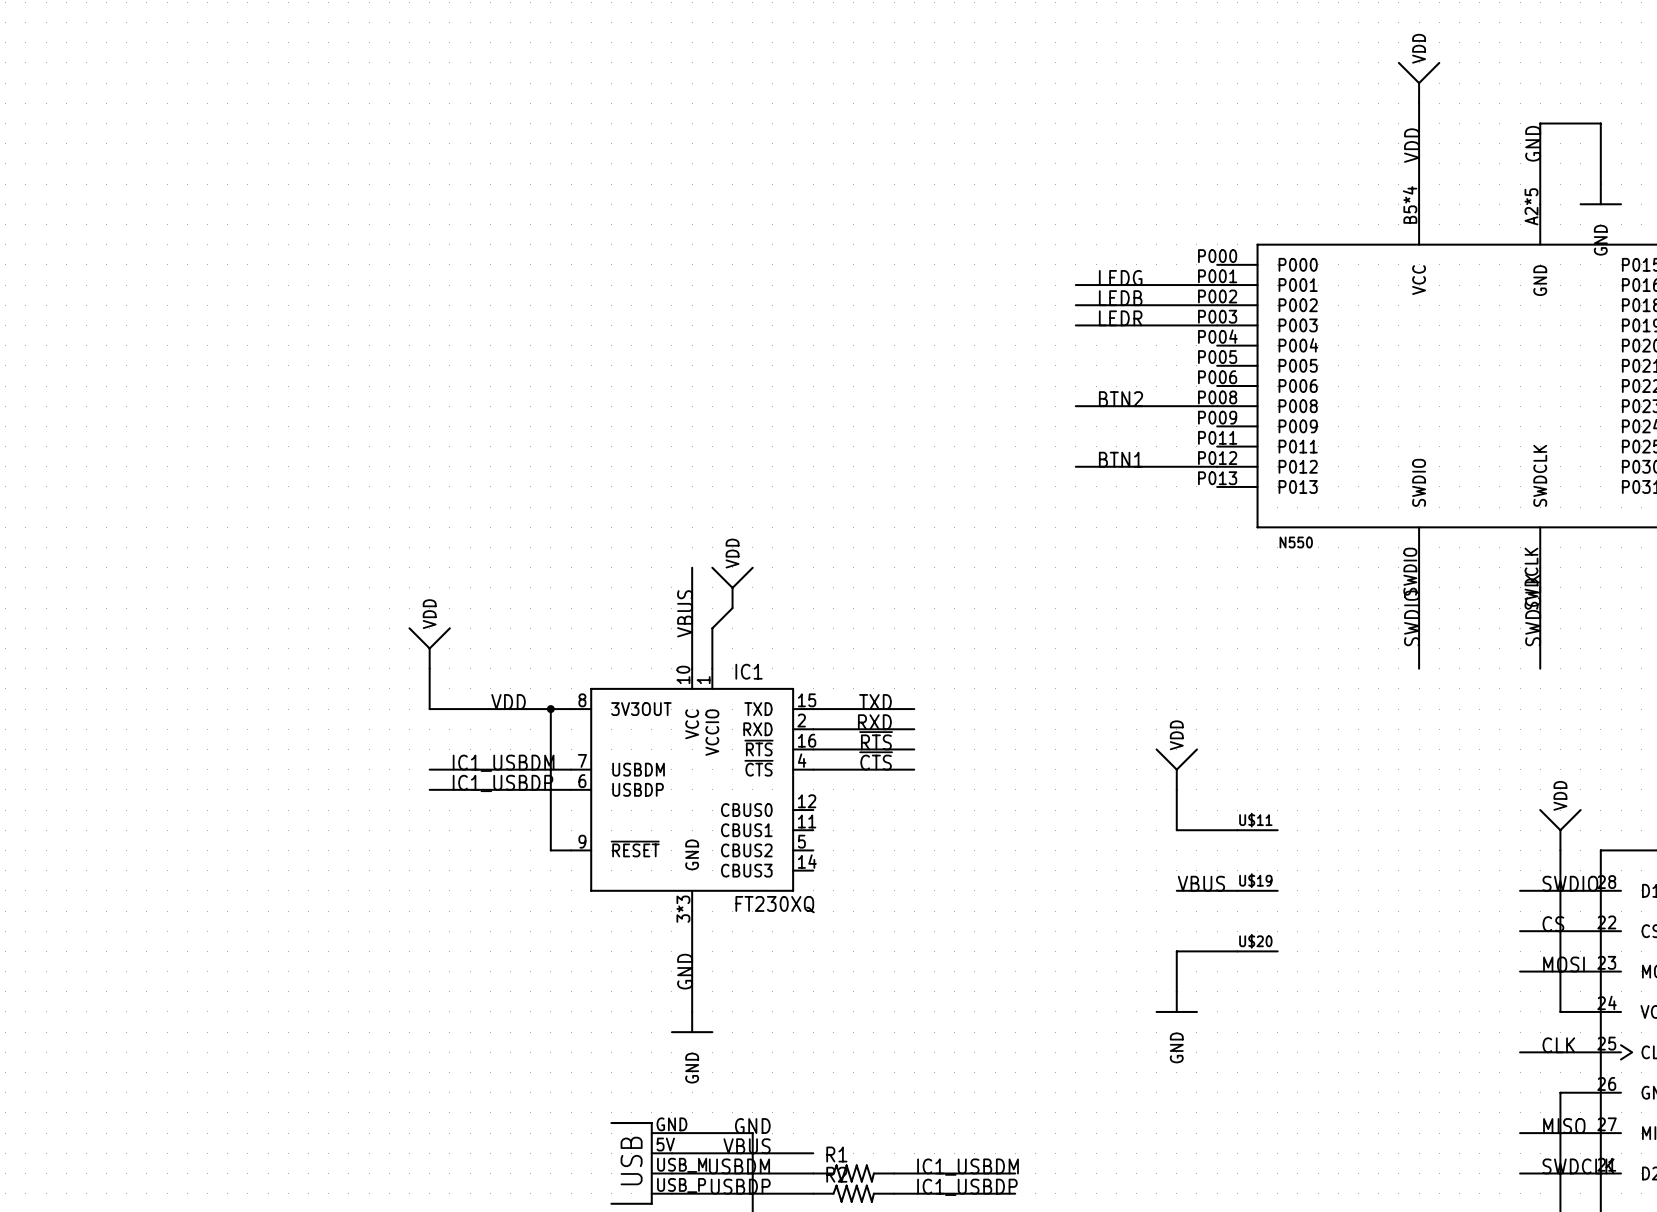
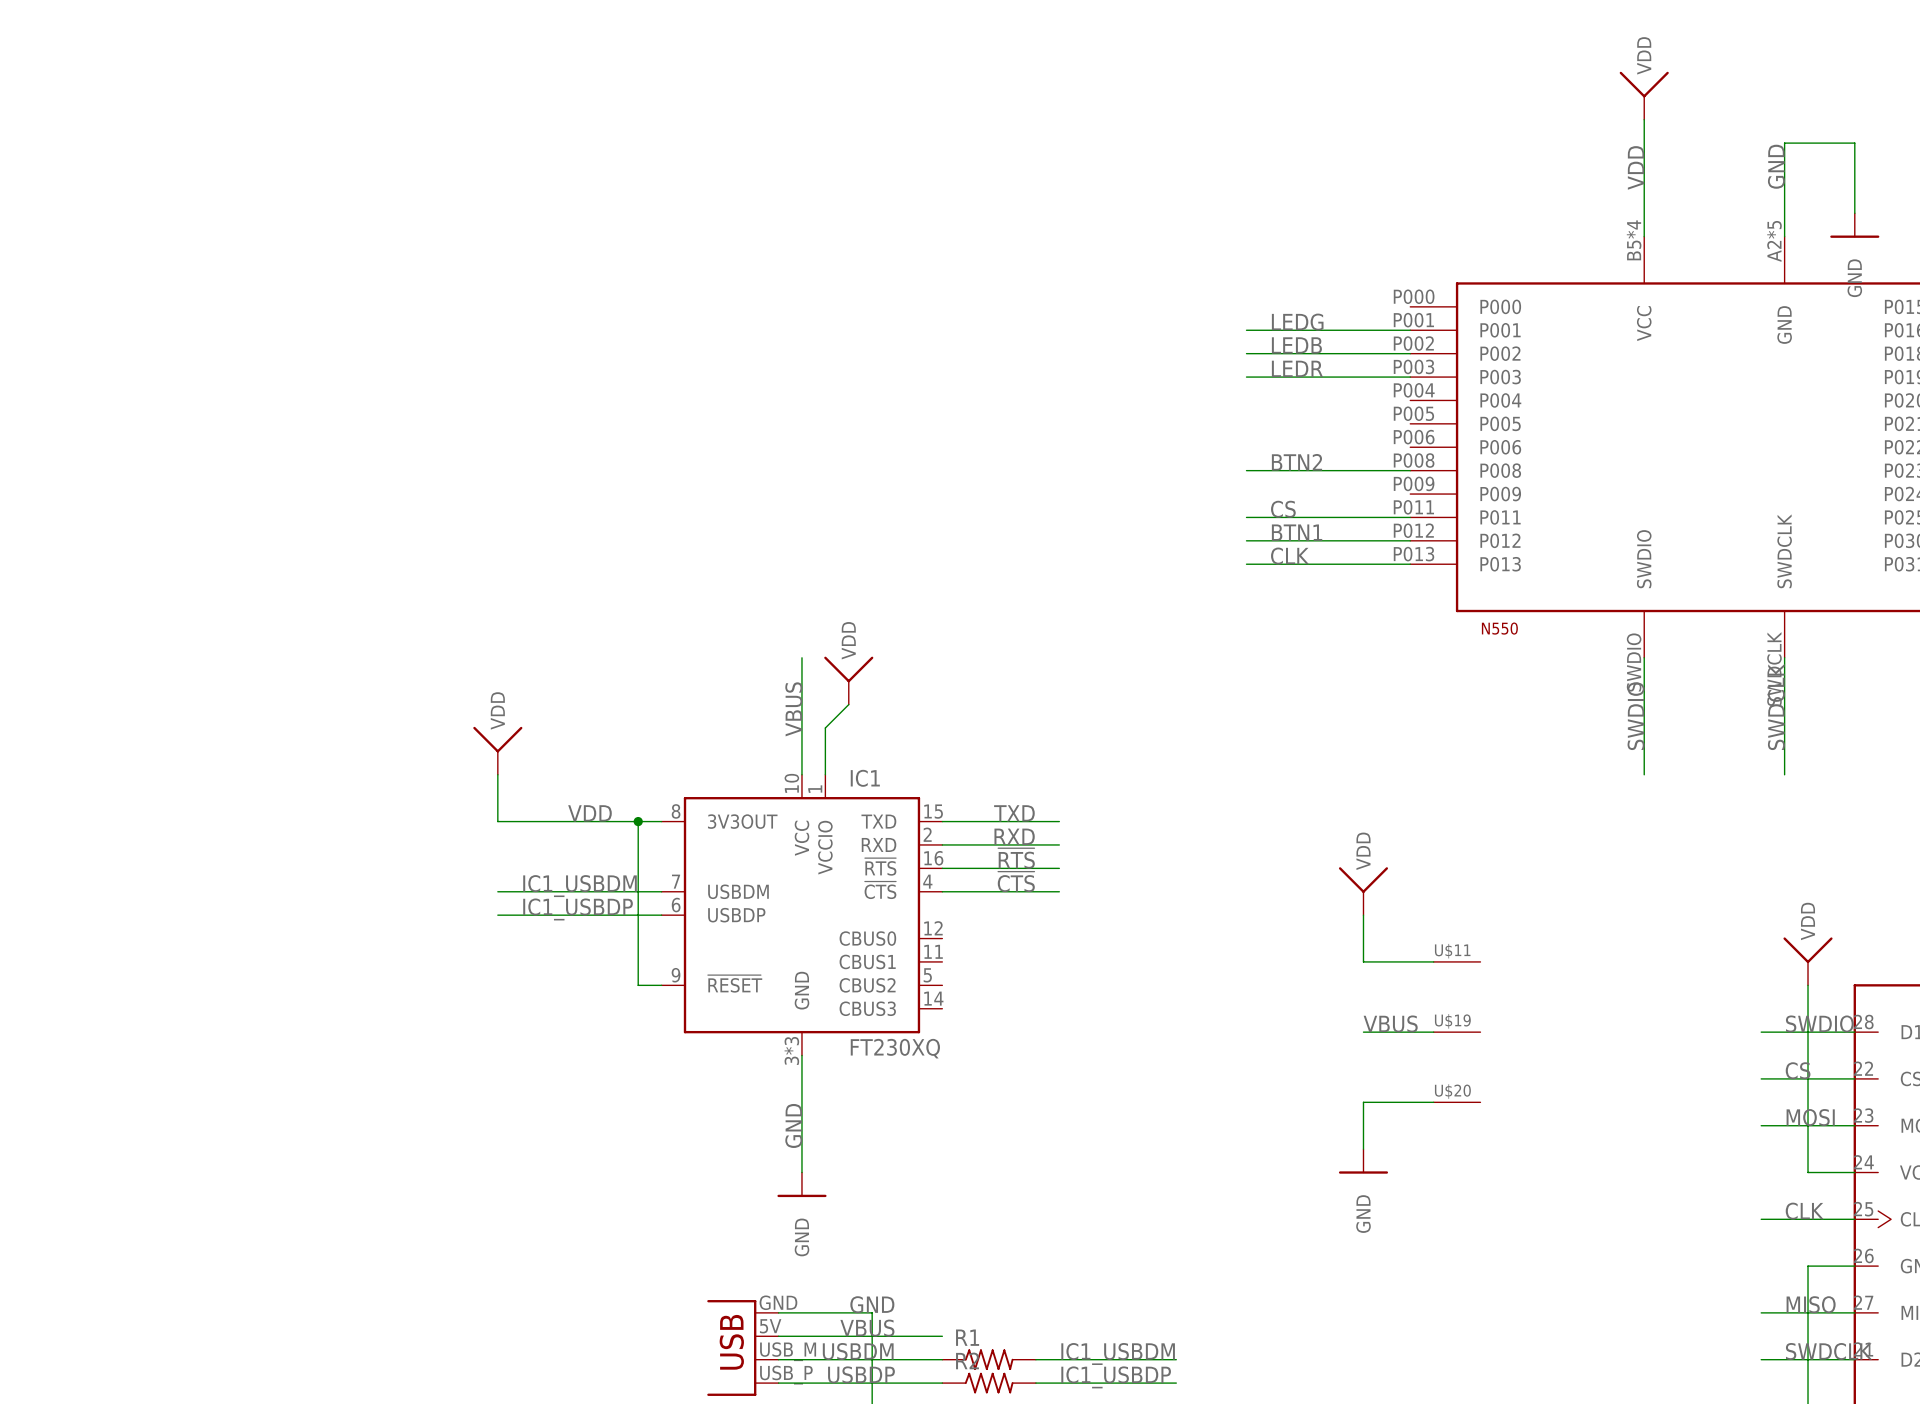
label: none -> CS (1283, 509)
wire: none -> (1246, 517) (1410, 517)
label: none -> CLK (1289, 556)
wire: none -> (1246, 564) (1410, 564)

